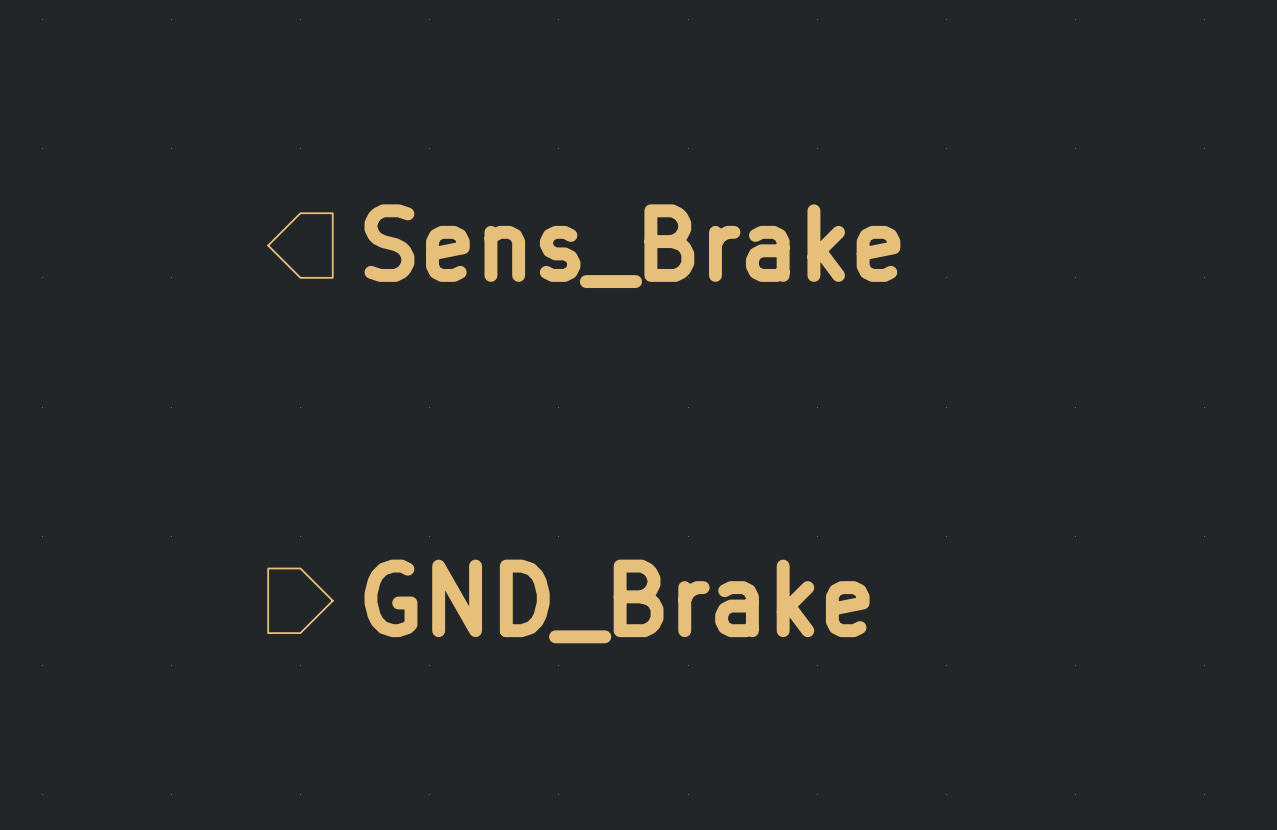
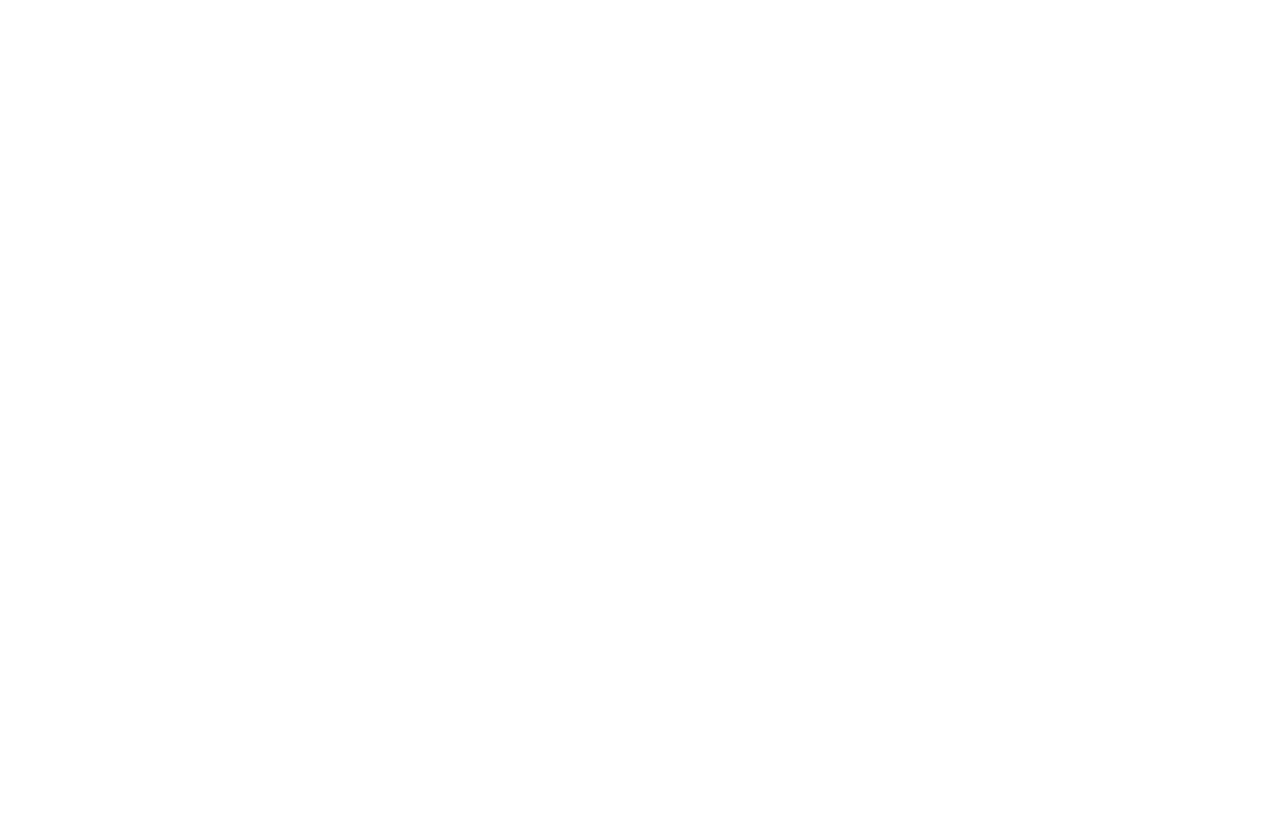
hierarchical label: Sens_Brake (632, 246) -> none
hierarchical label: GND_Brake (617, 601) -> none

